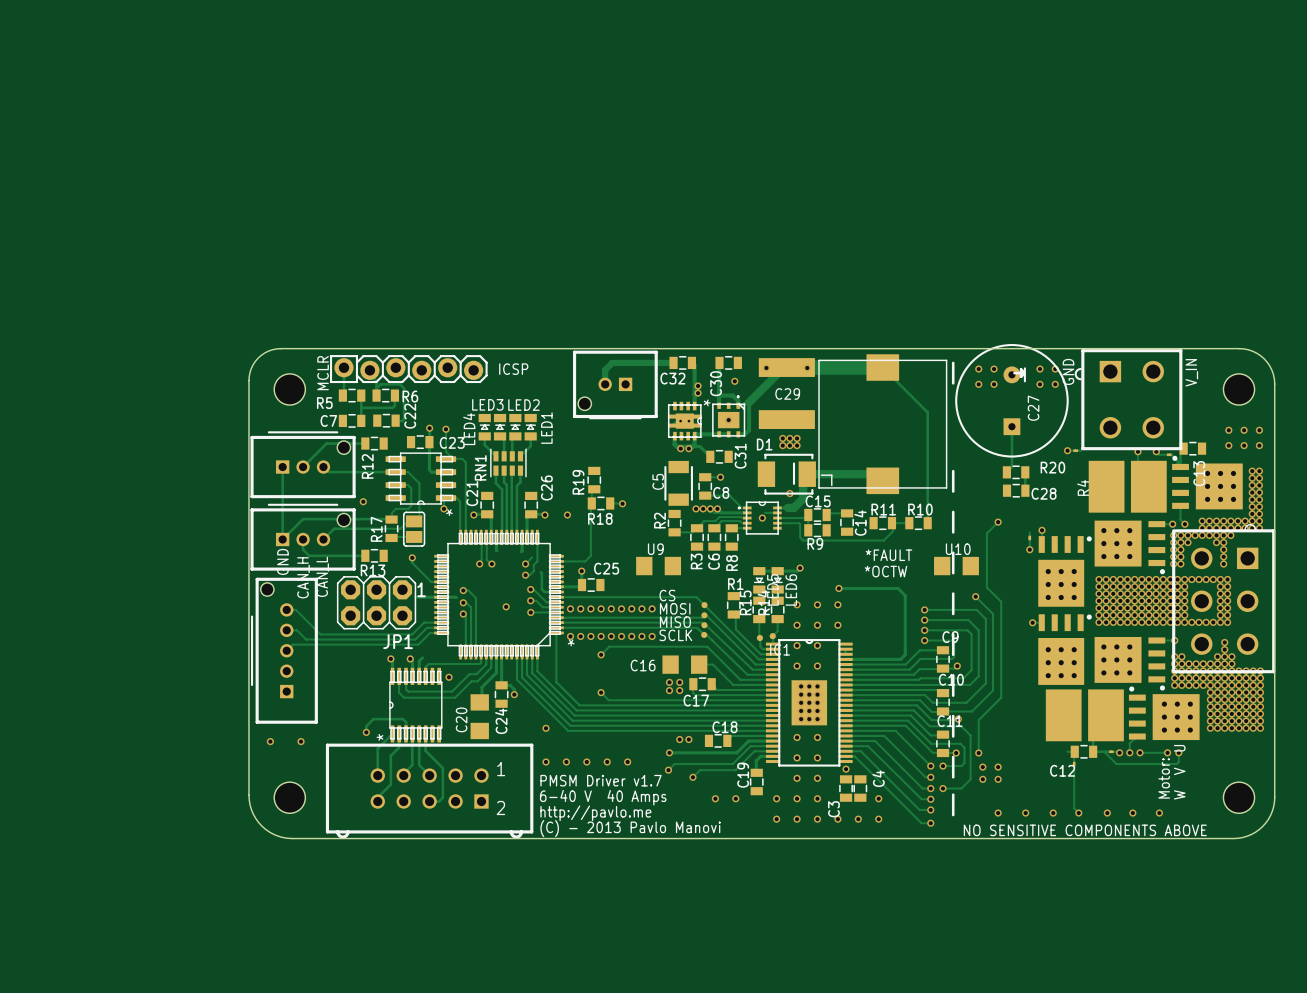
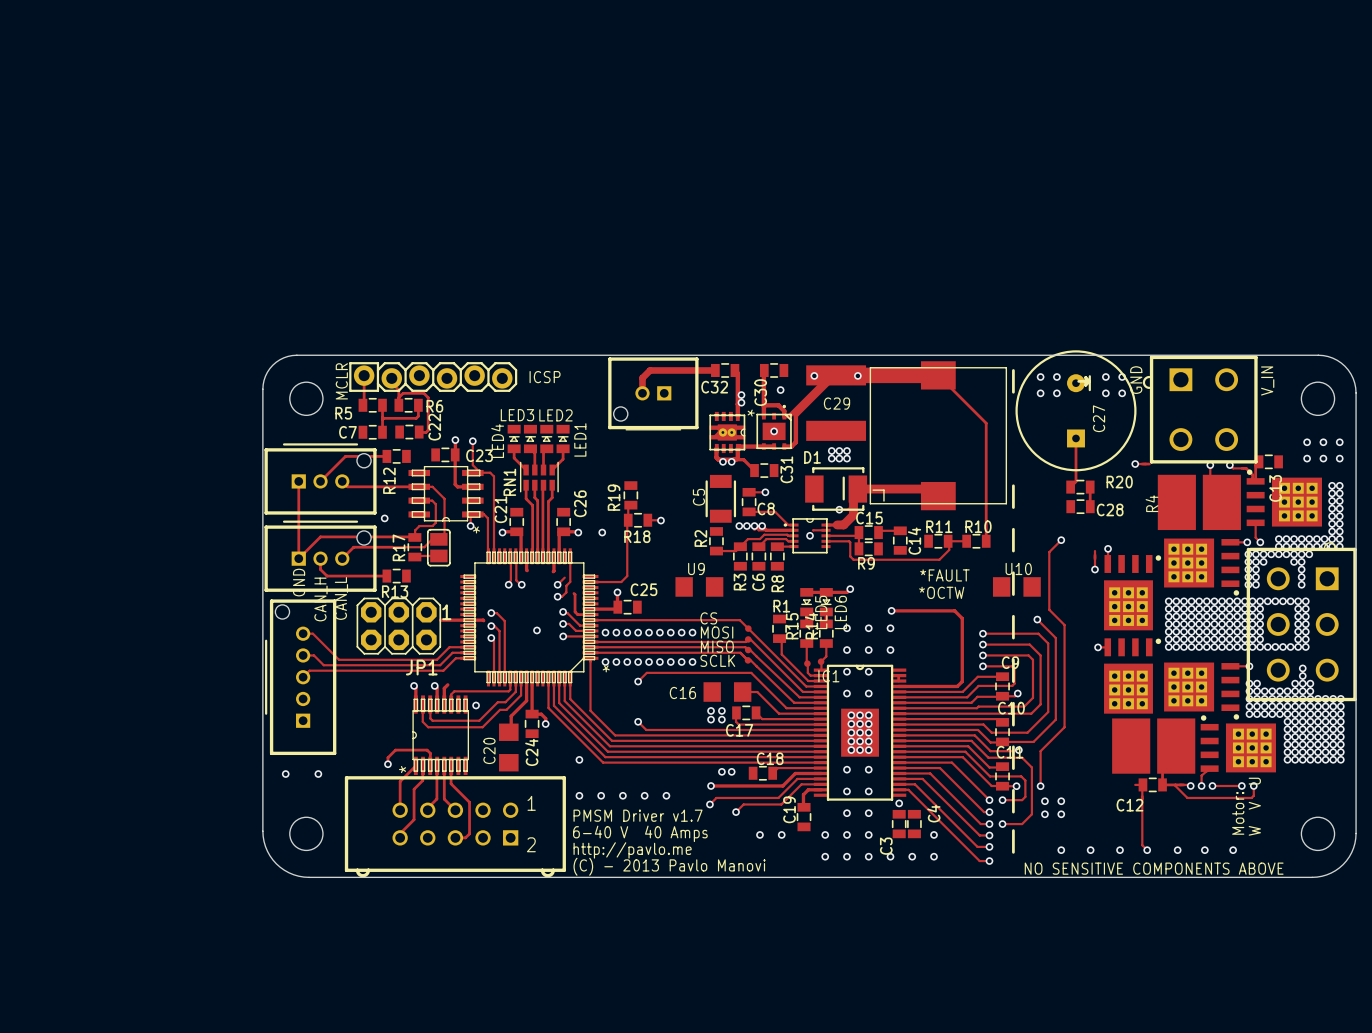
track: (412, 557) (412, 562) (431, 581) (441, 581) -> none
via: (412, 557) -> none

